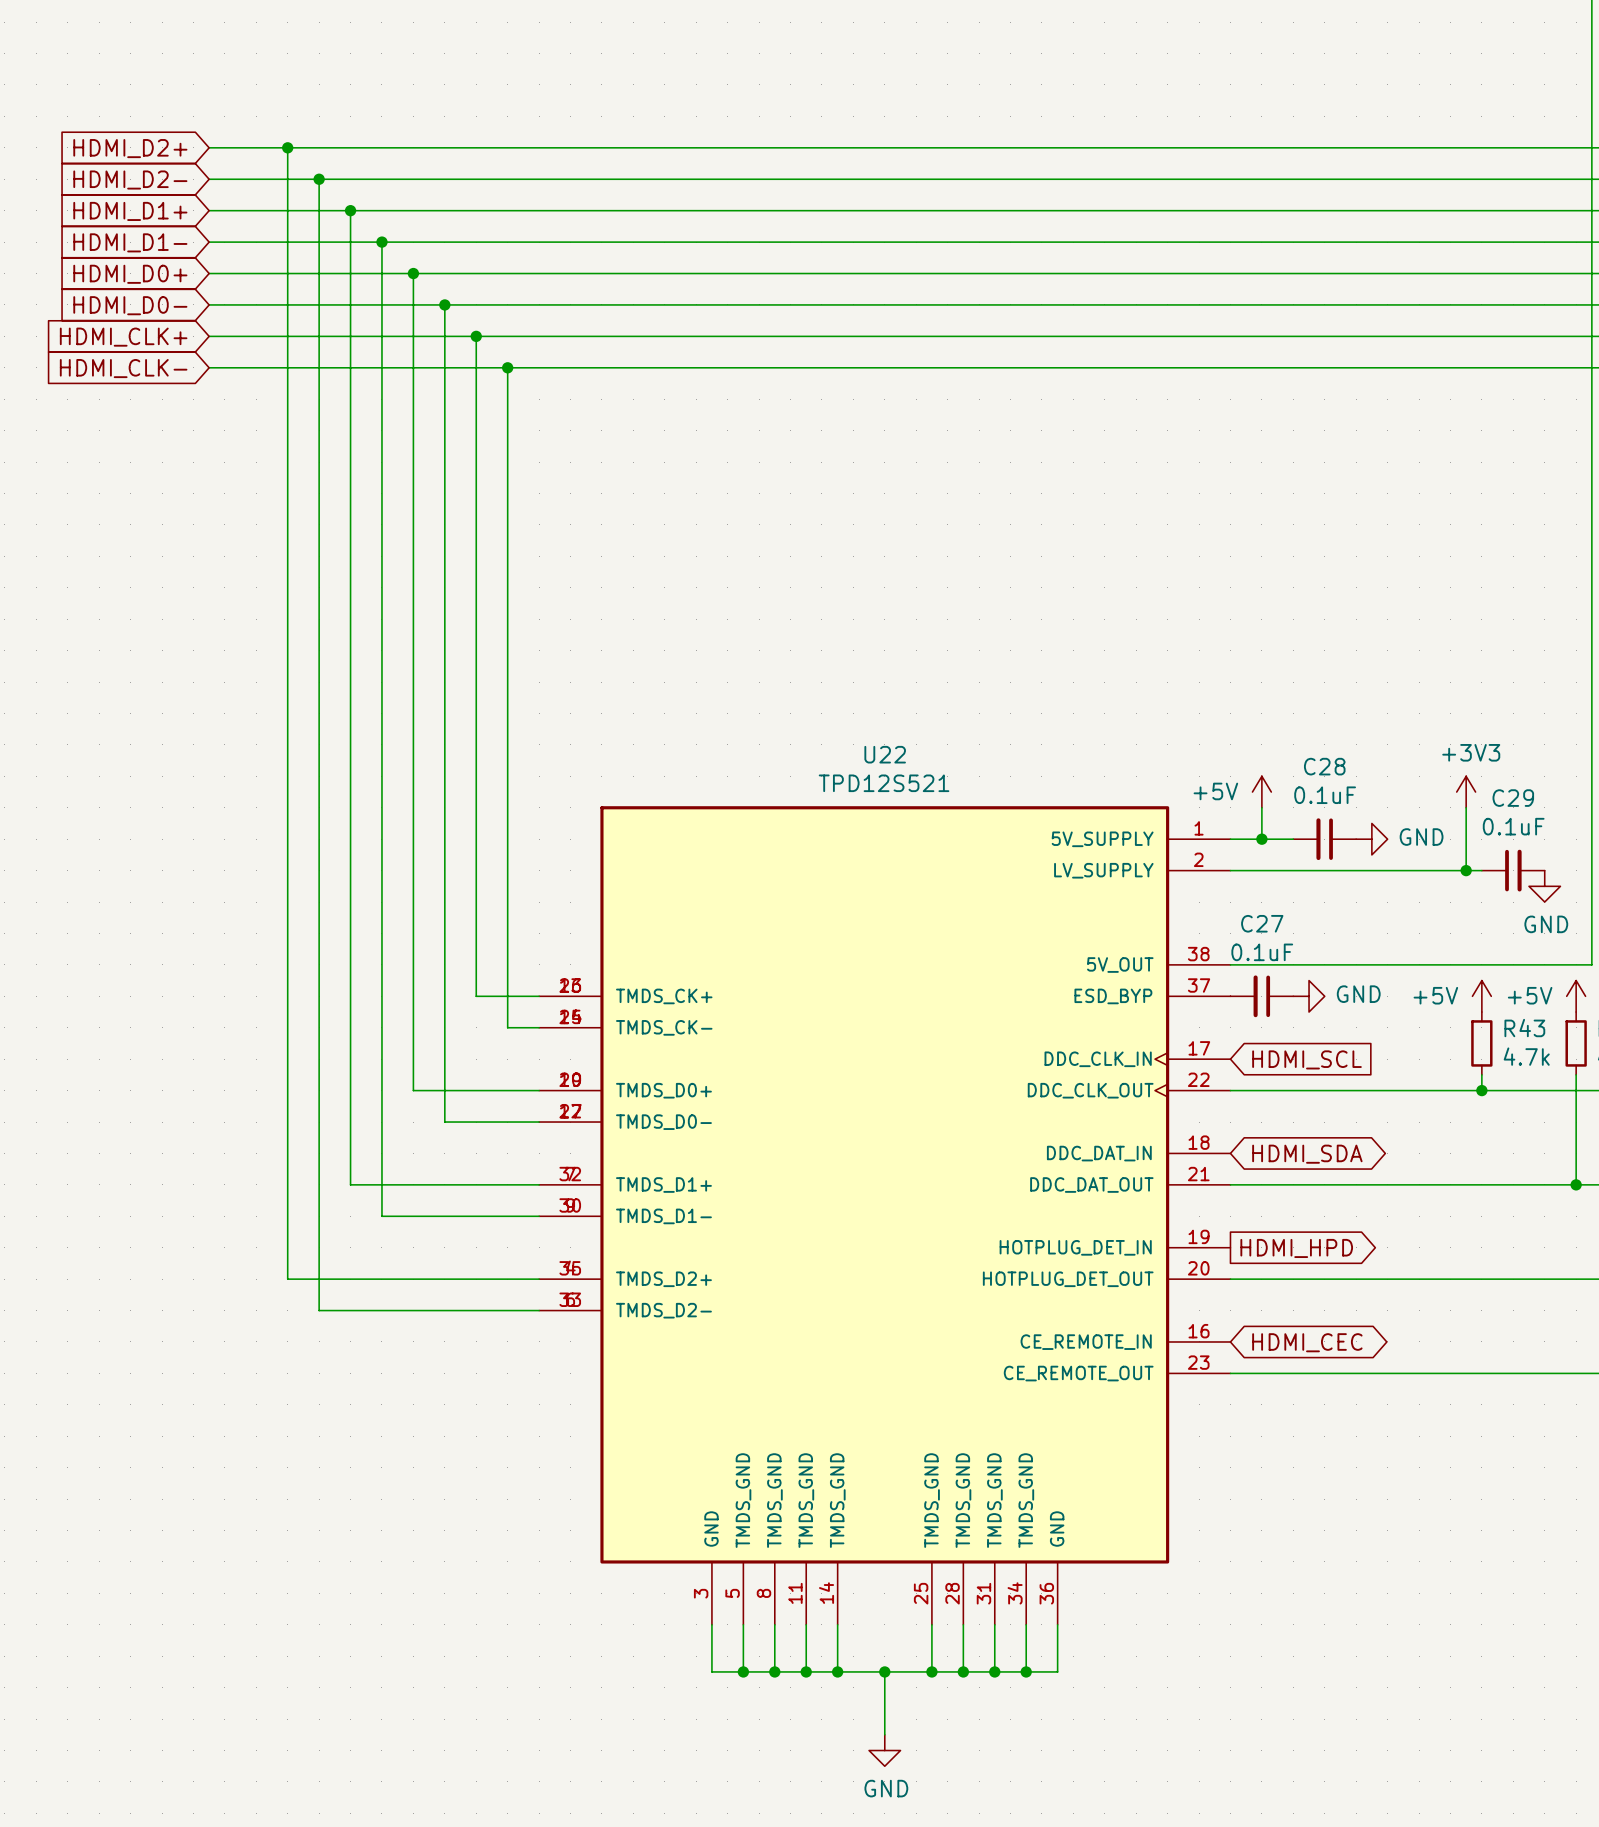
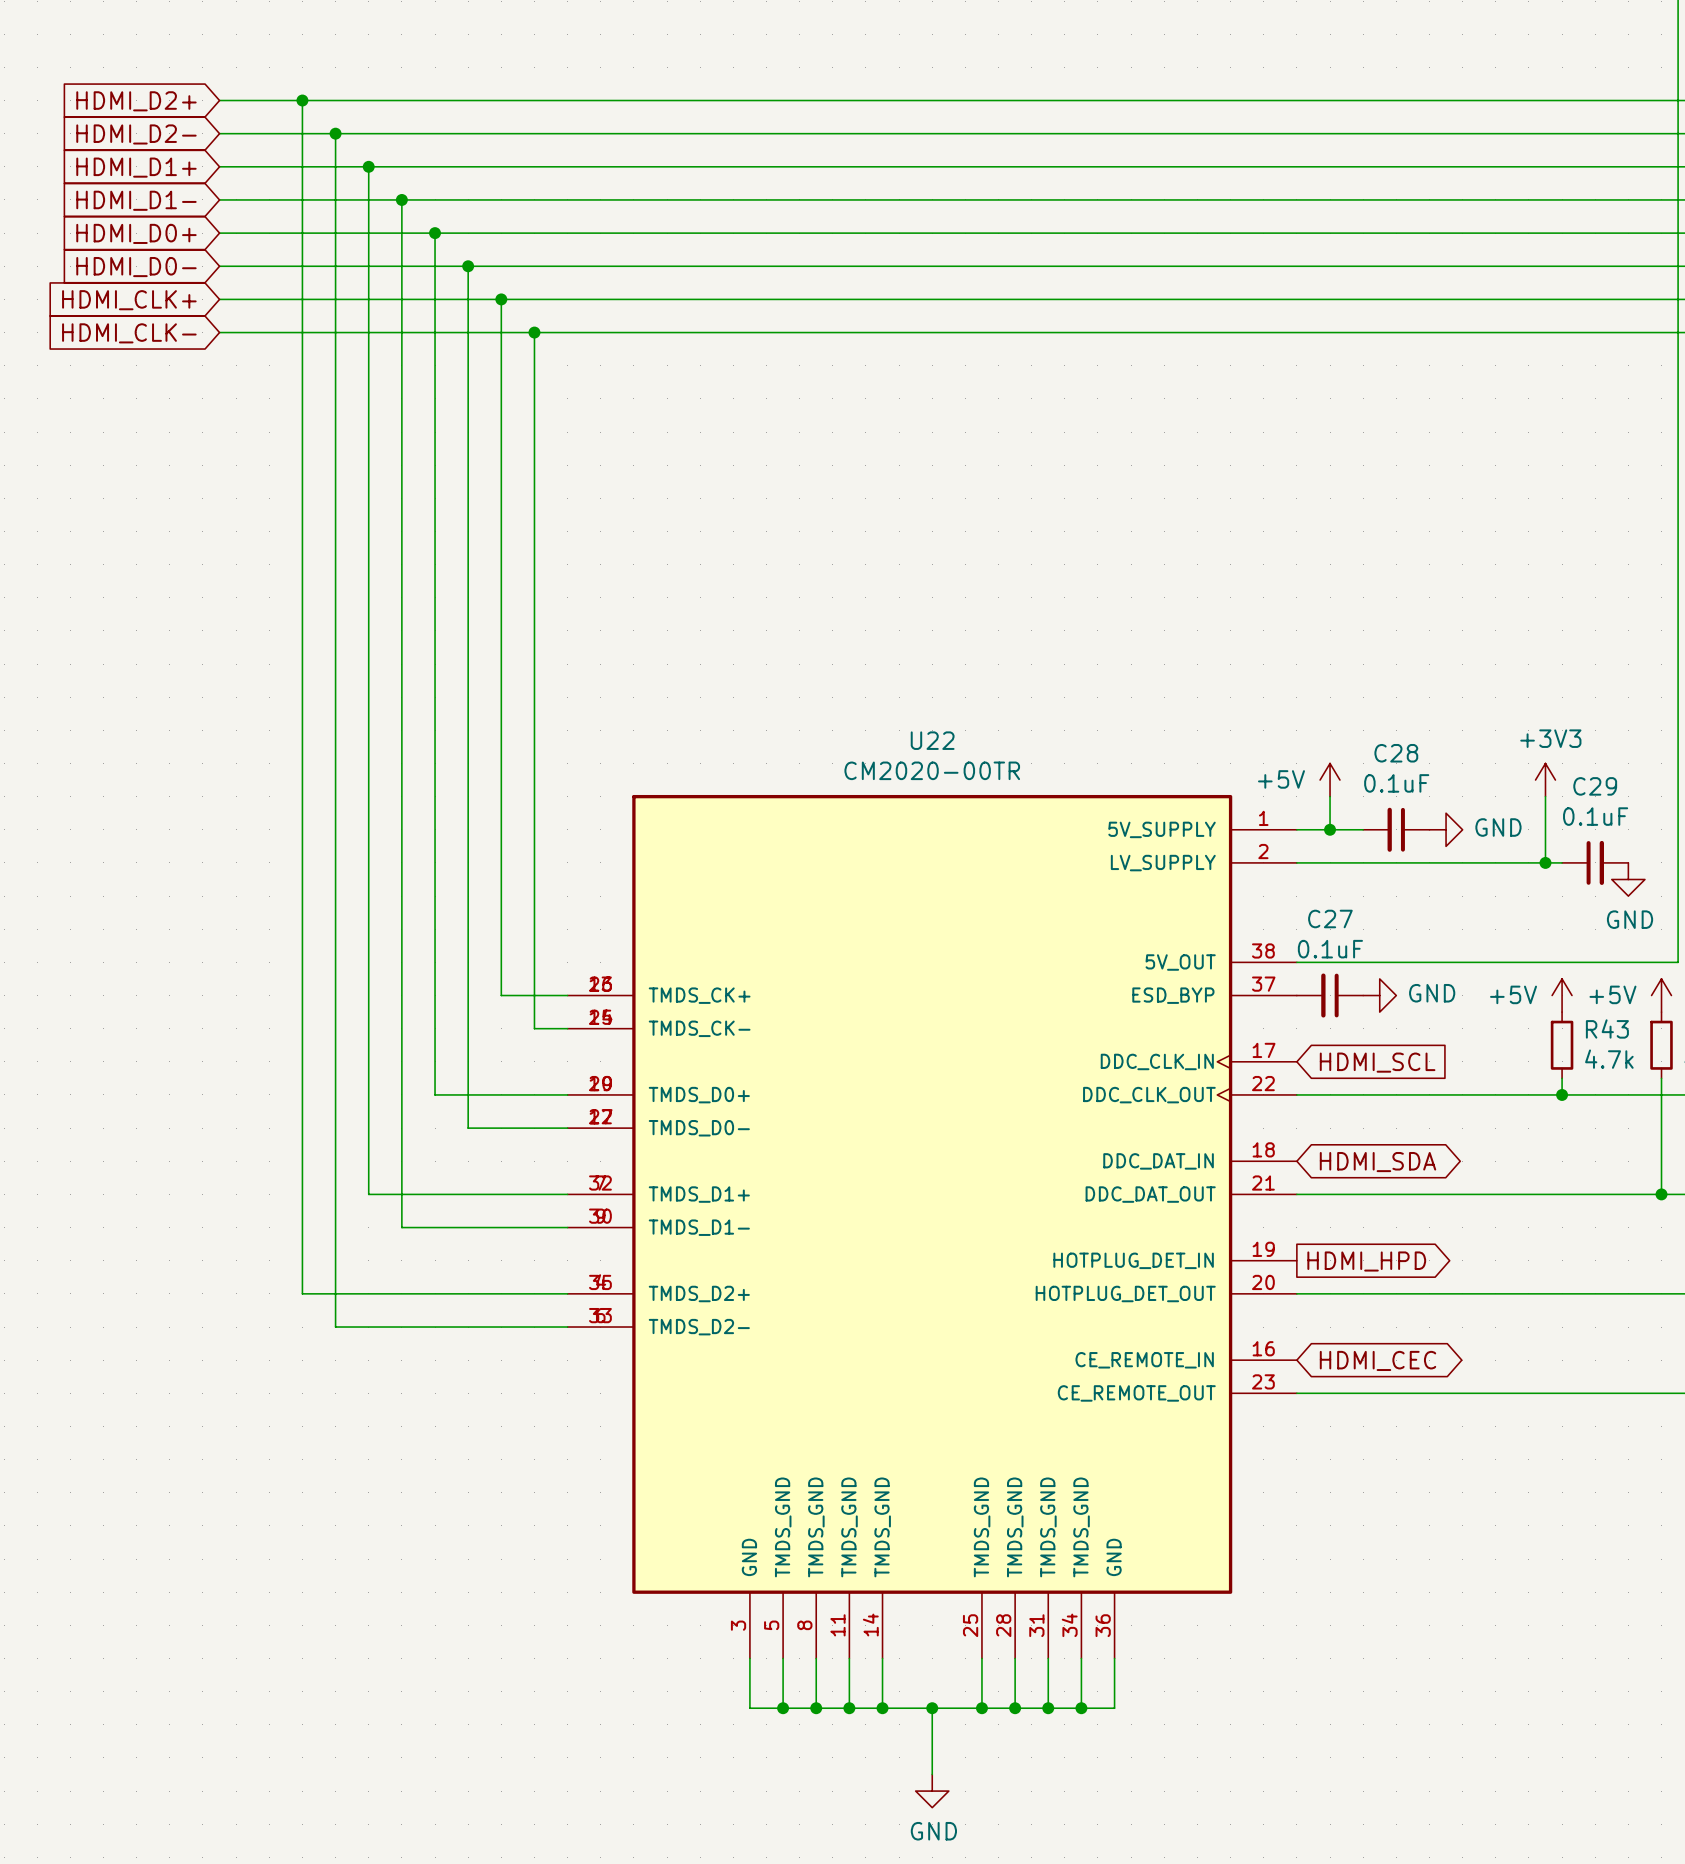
U22 value: TPD12S521 (884, 783) -> CM2020-00TR (932, 770)

